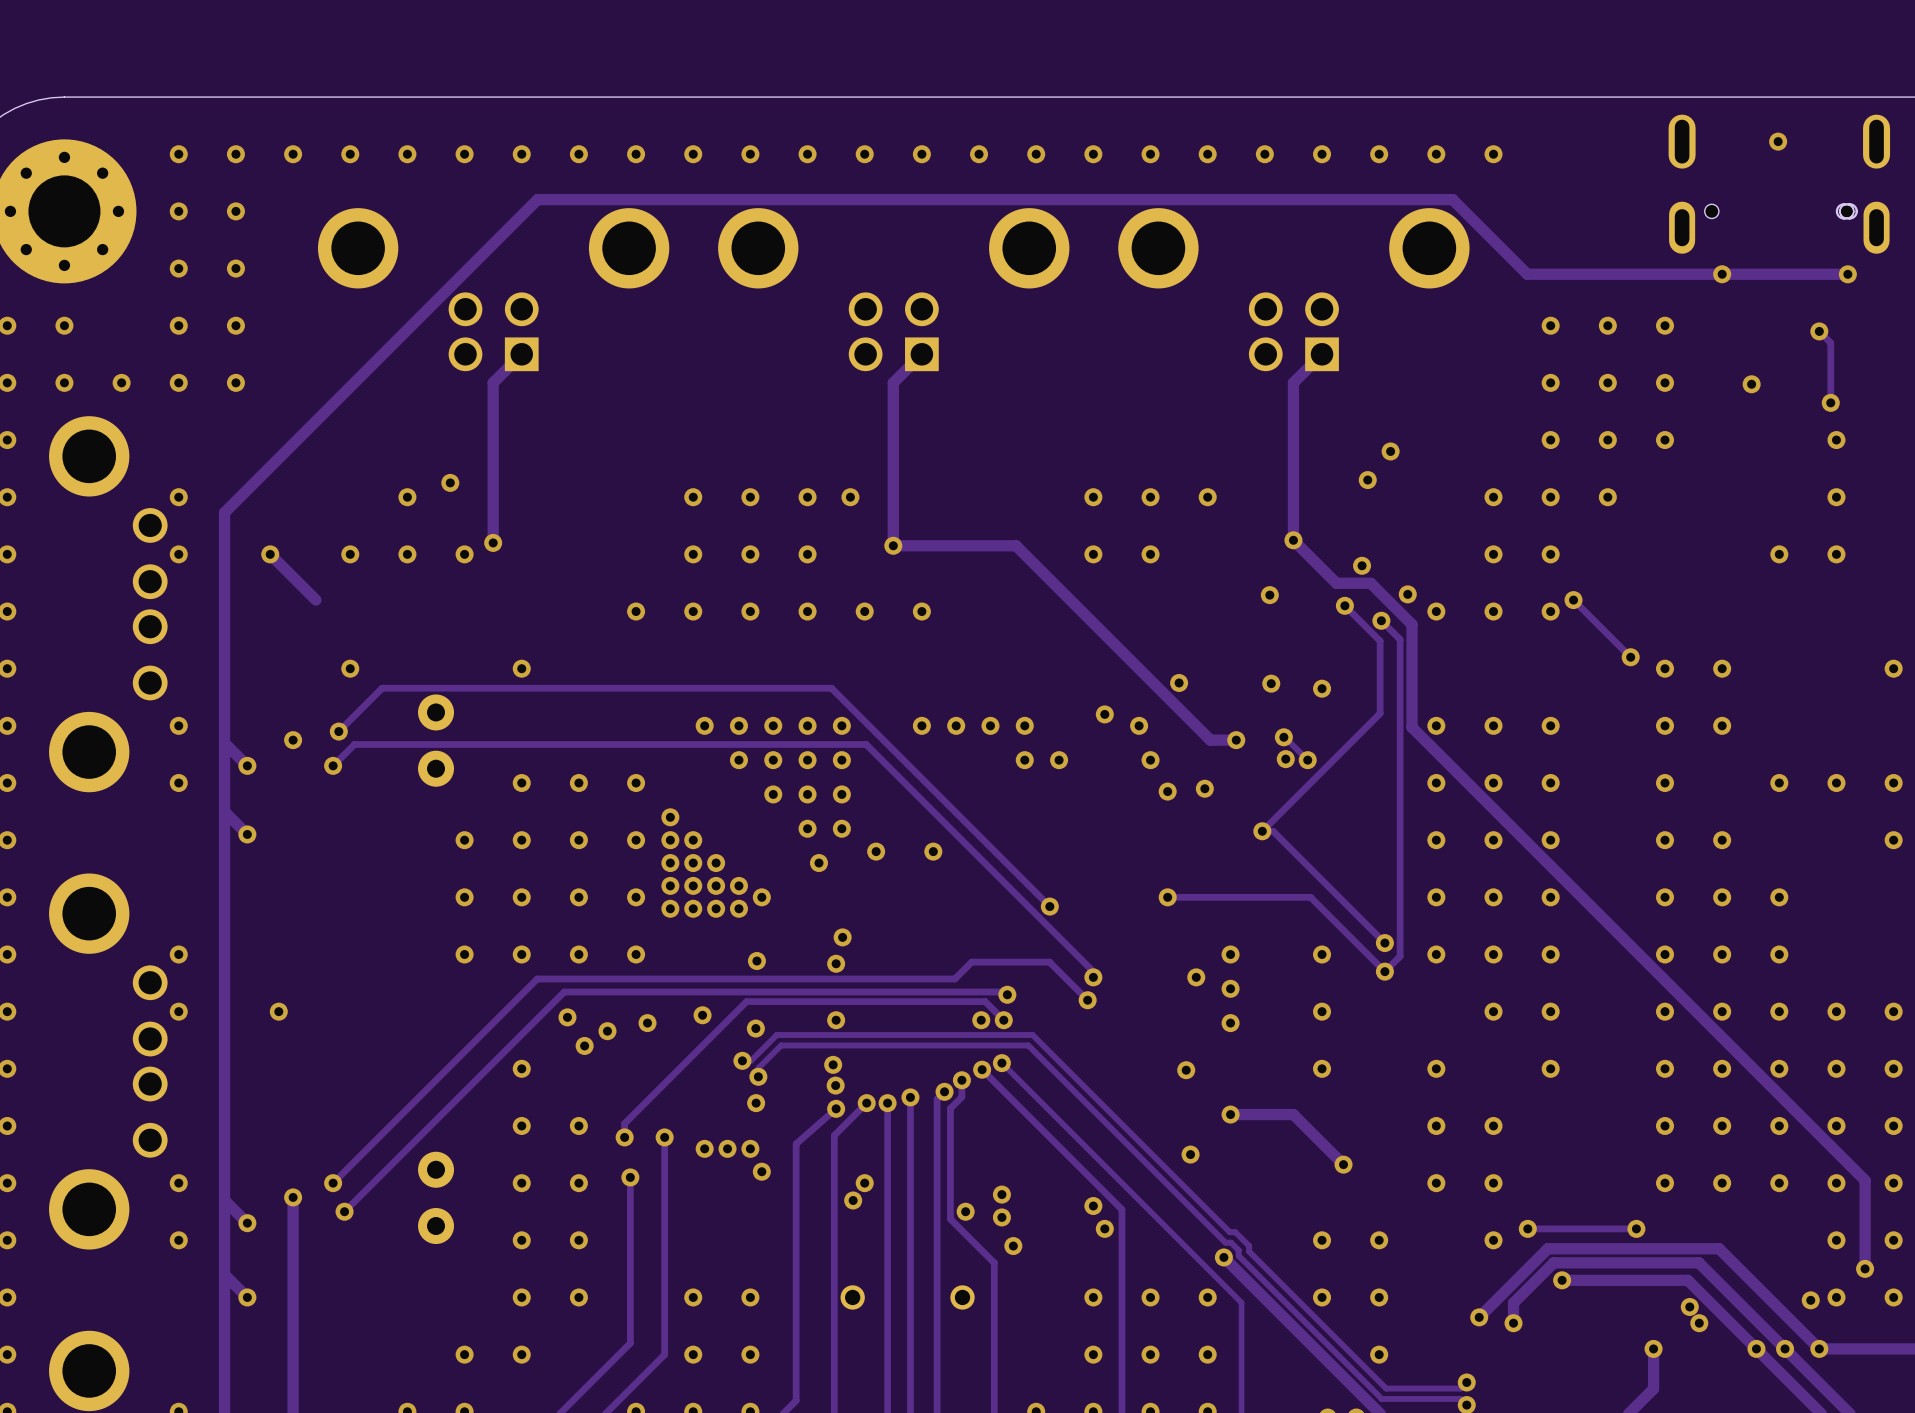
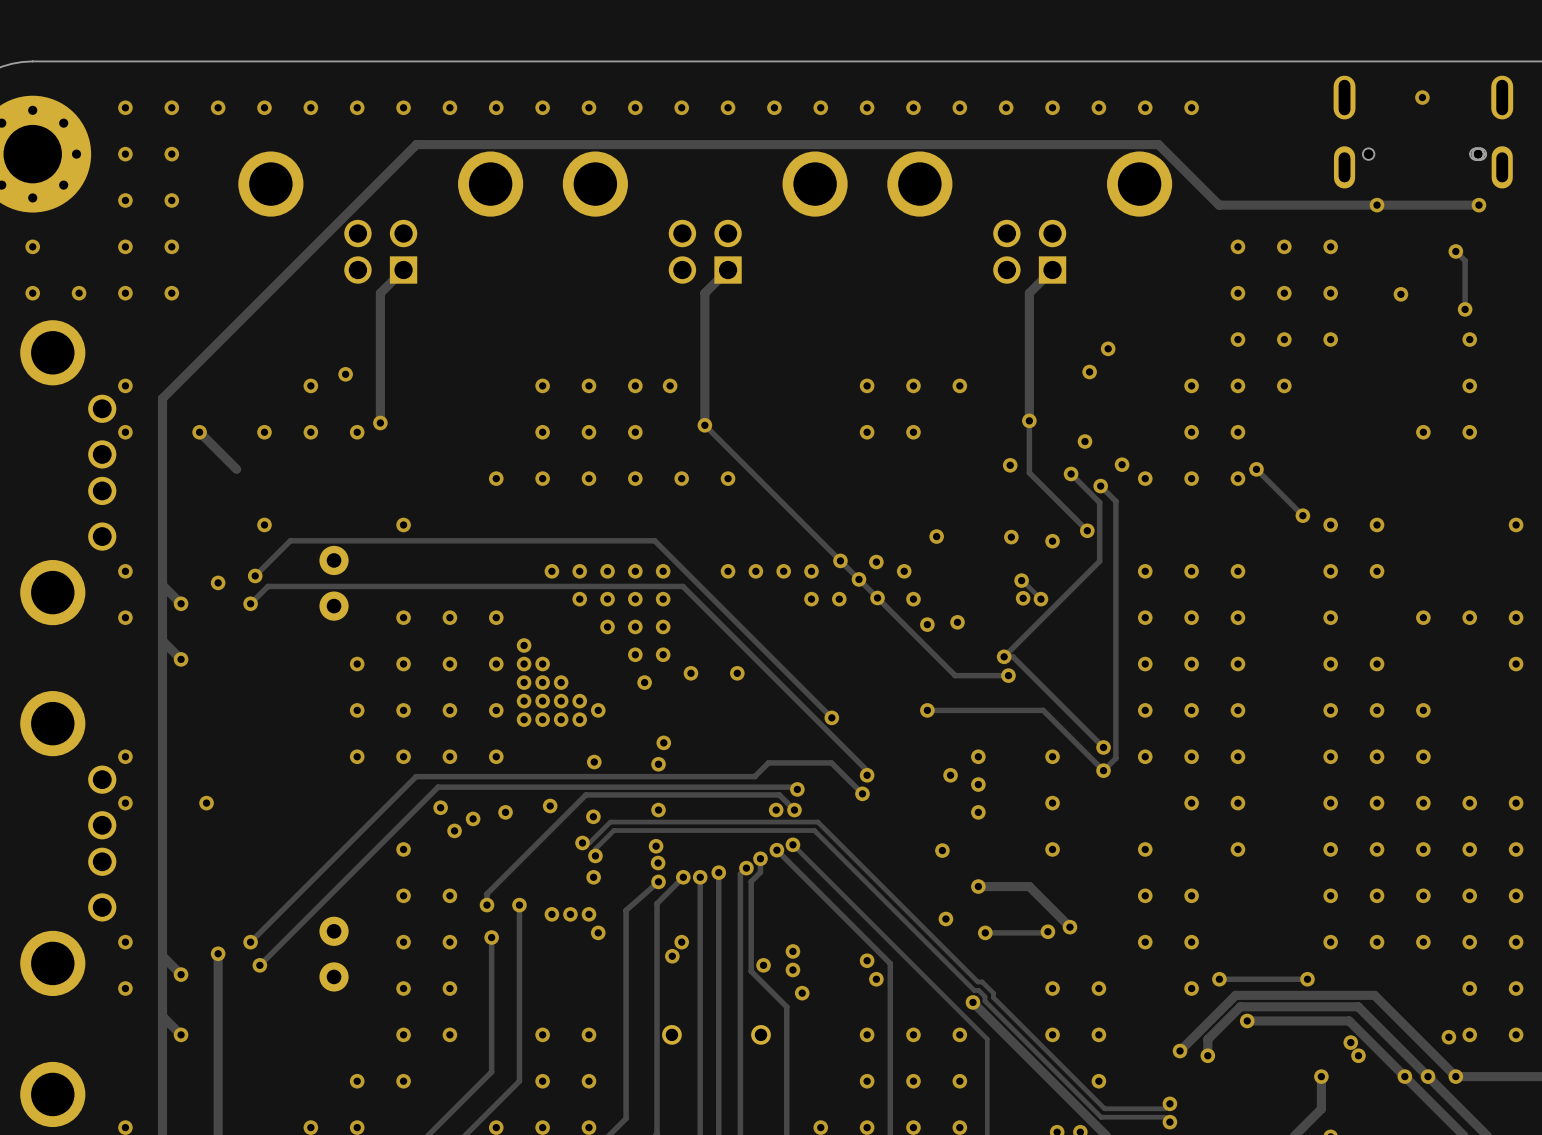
track: (1293, 540) (1336, 583) (1370, 583) (1412, 624) (1412, 727) (1865, 1180) (1865, 1268) -> (1029, 420) (1029, 472) (1087, 530)
track: (893, 545) (1016, 545) (1210, 740) (1236, 740) -> (704, 425) (955, 675) (1008, 675)
via: none -> (1087, 530)
via: none -> (840, 560)
via: none -> (859, 579)
via: (1236, 740) -> none
via: none -> (877, 597)
via: none -> (1008, 675)
track: none -> (1047, 931) (985, 932)
via: none -> (1047, 931)
via: none -> (985, 932)
via: (1865, 1268) -> none

